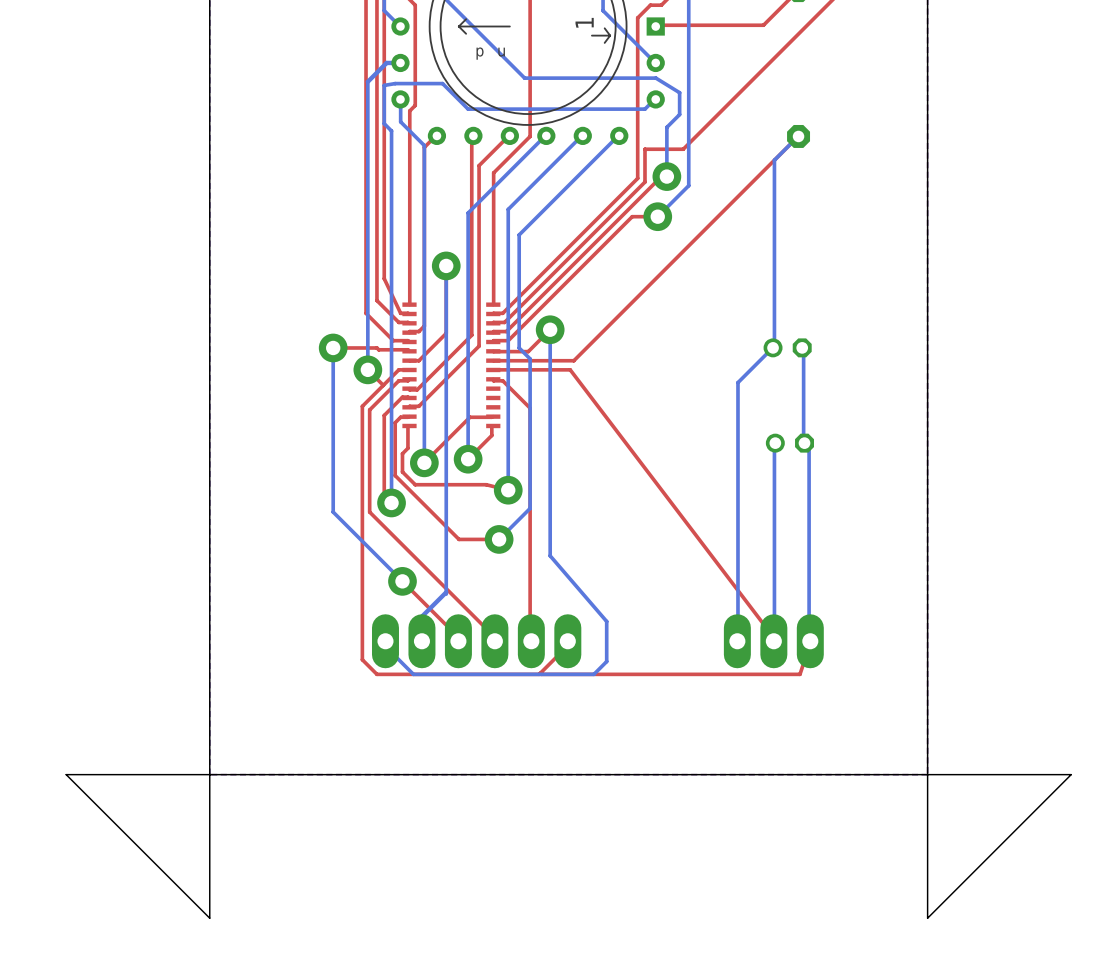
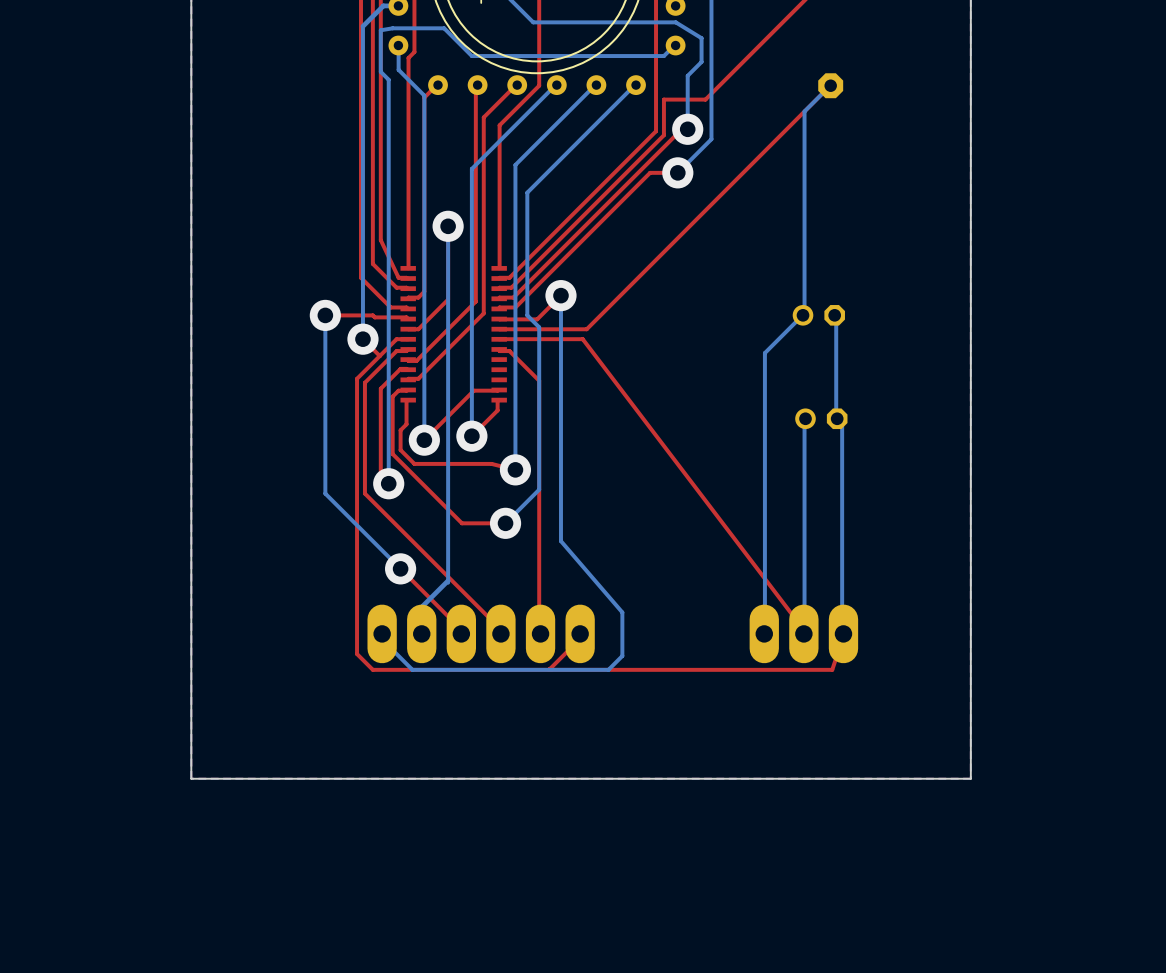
board edge: (209, 774) (66, 774) (209, 918) (209, 774) -> none
board edge: (1071, 774) (927, 774) (927, 918) (1071, 774) -> none

